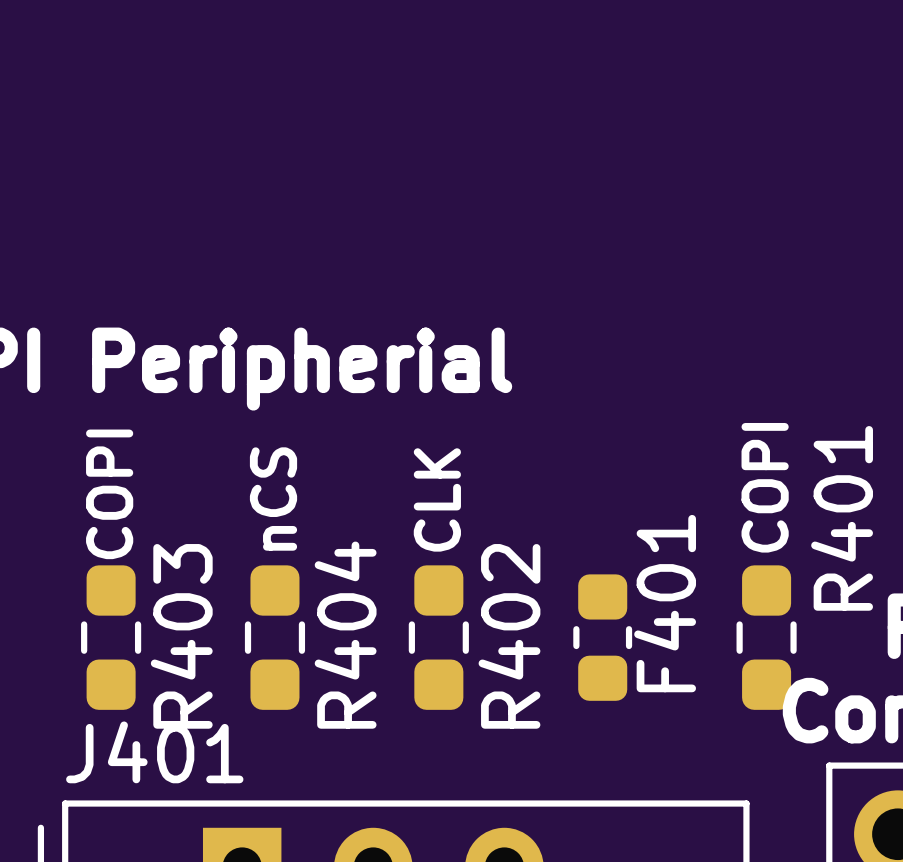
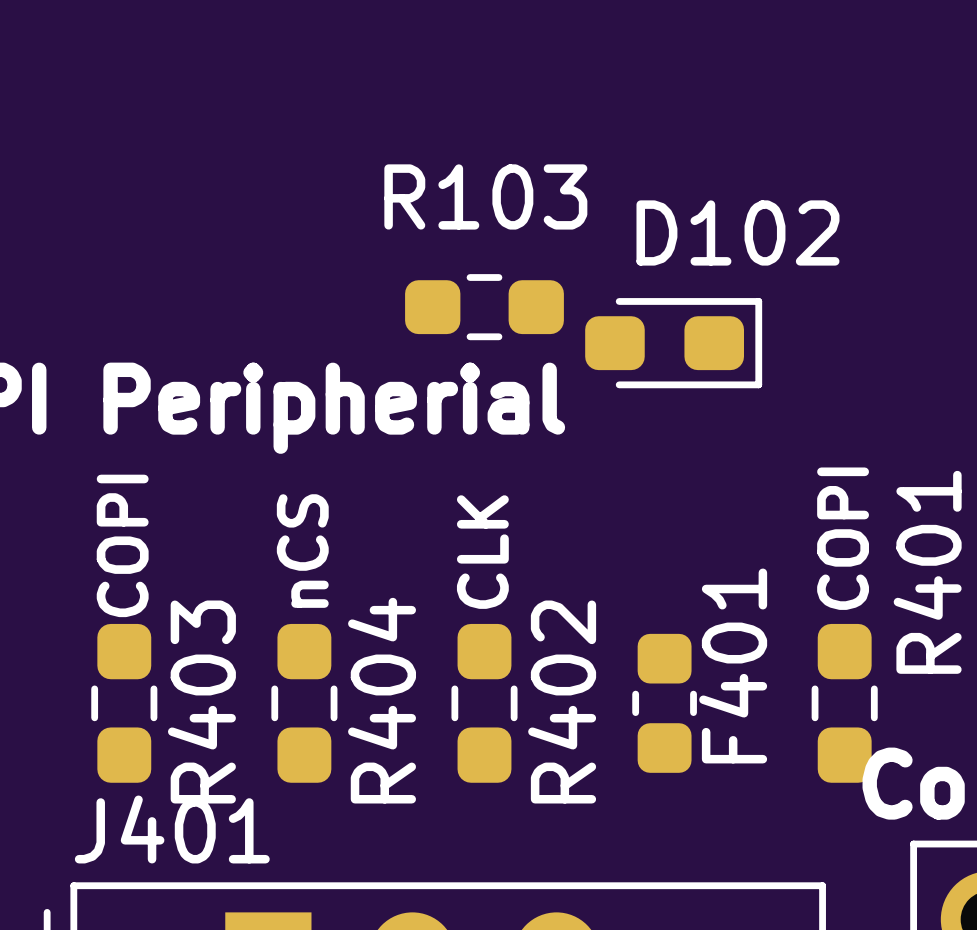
R103: none -> (484, 307)
D102: none -> (673, 343)

